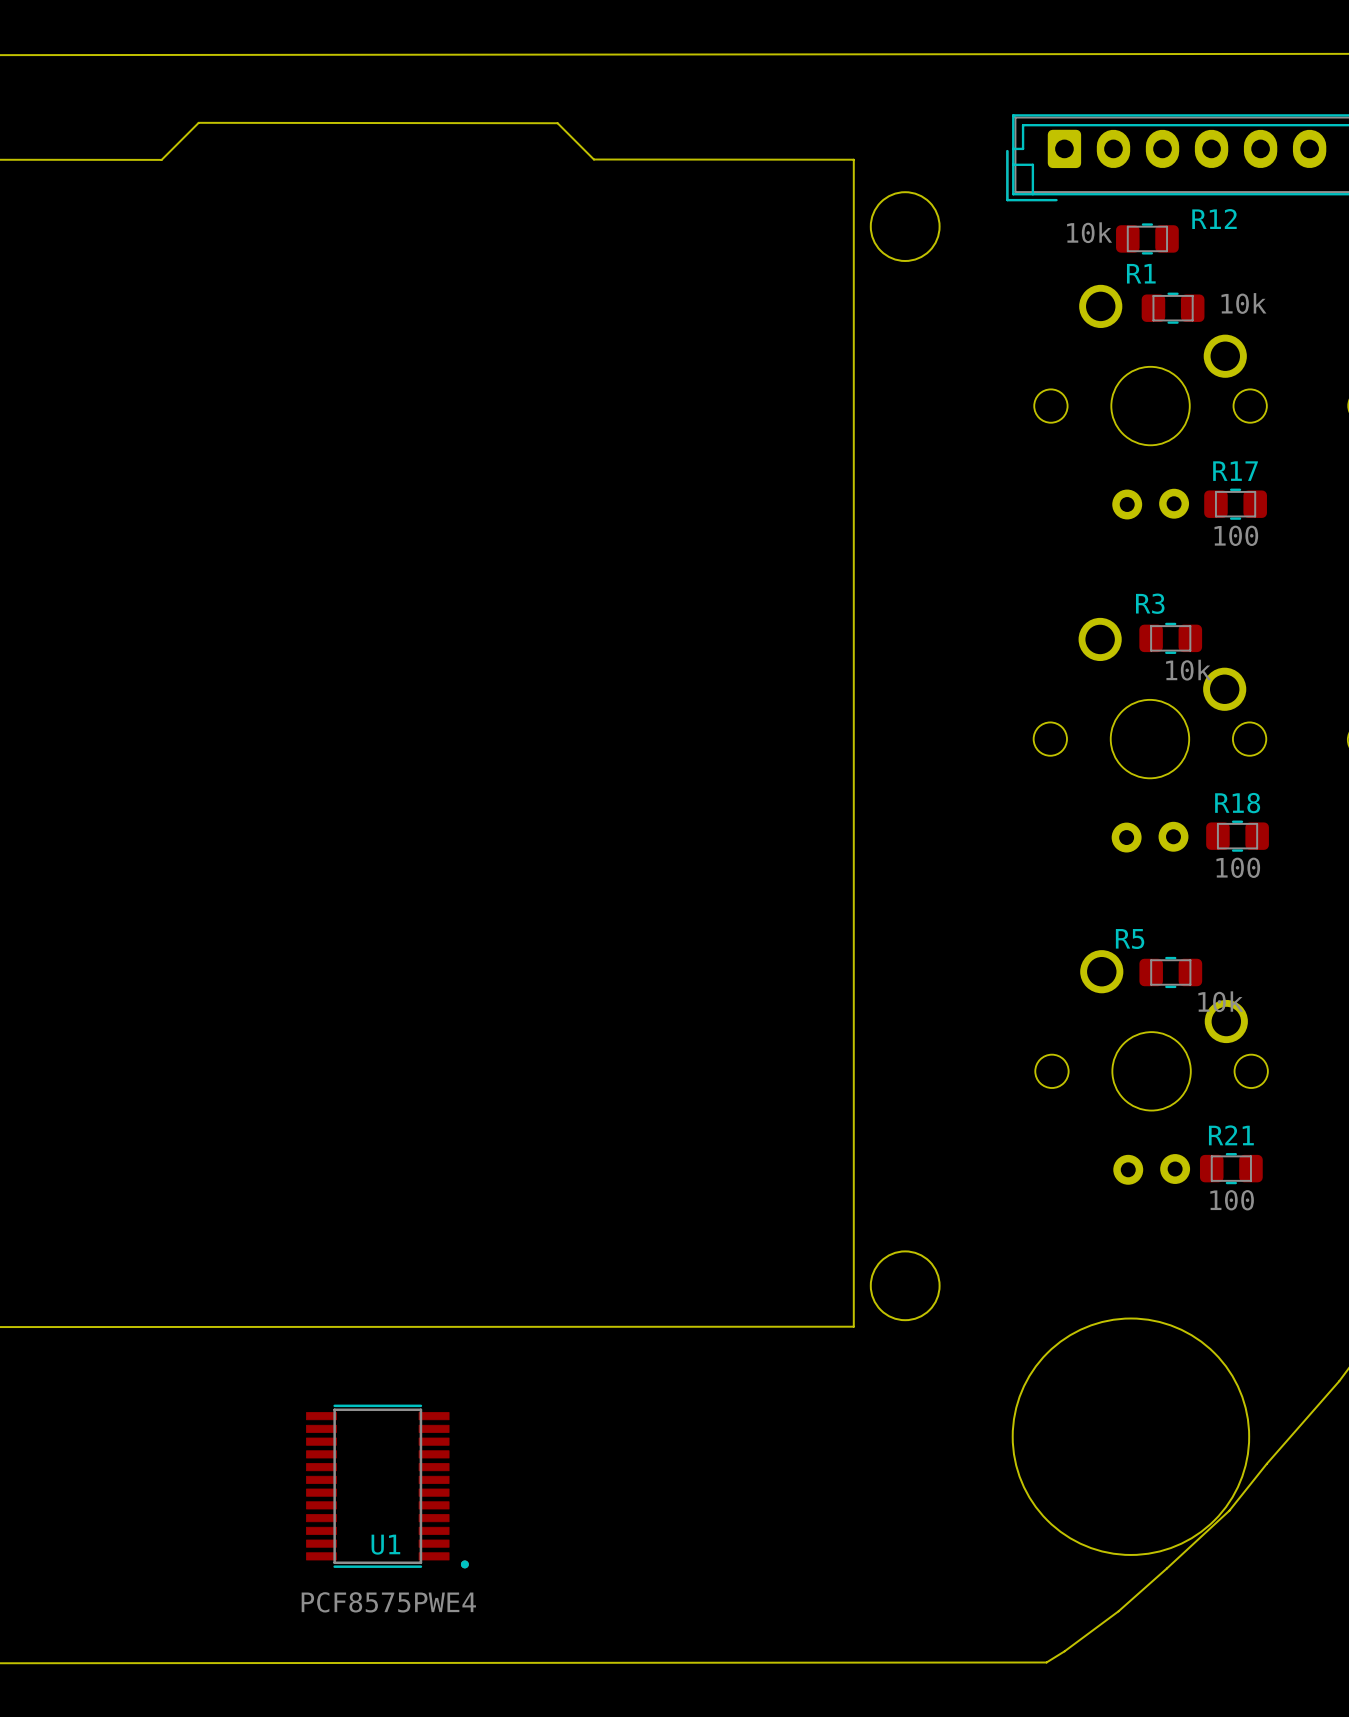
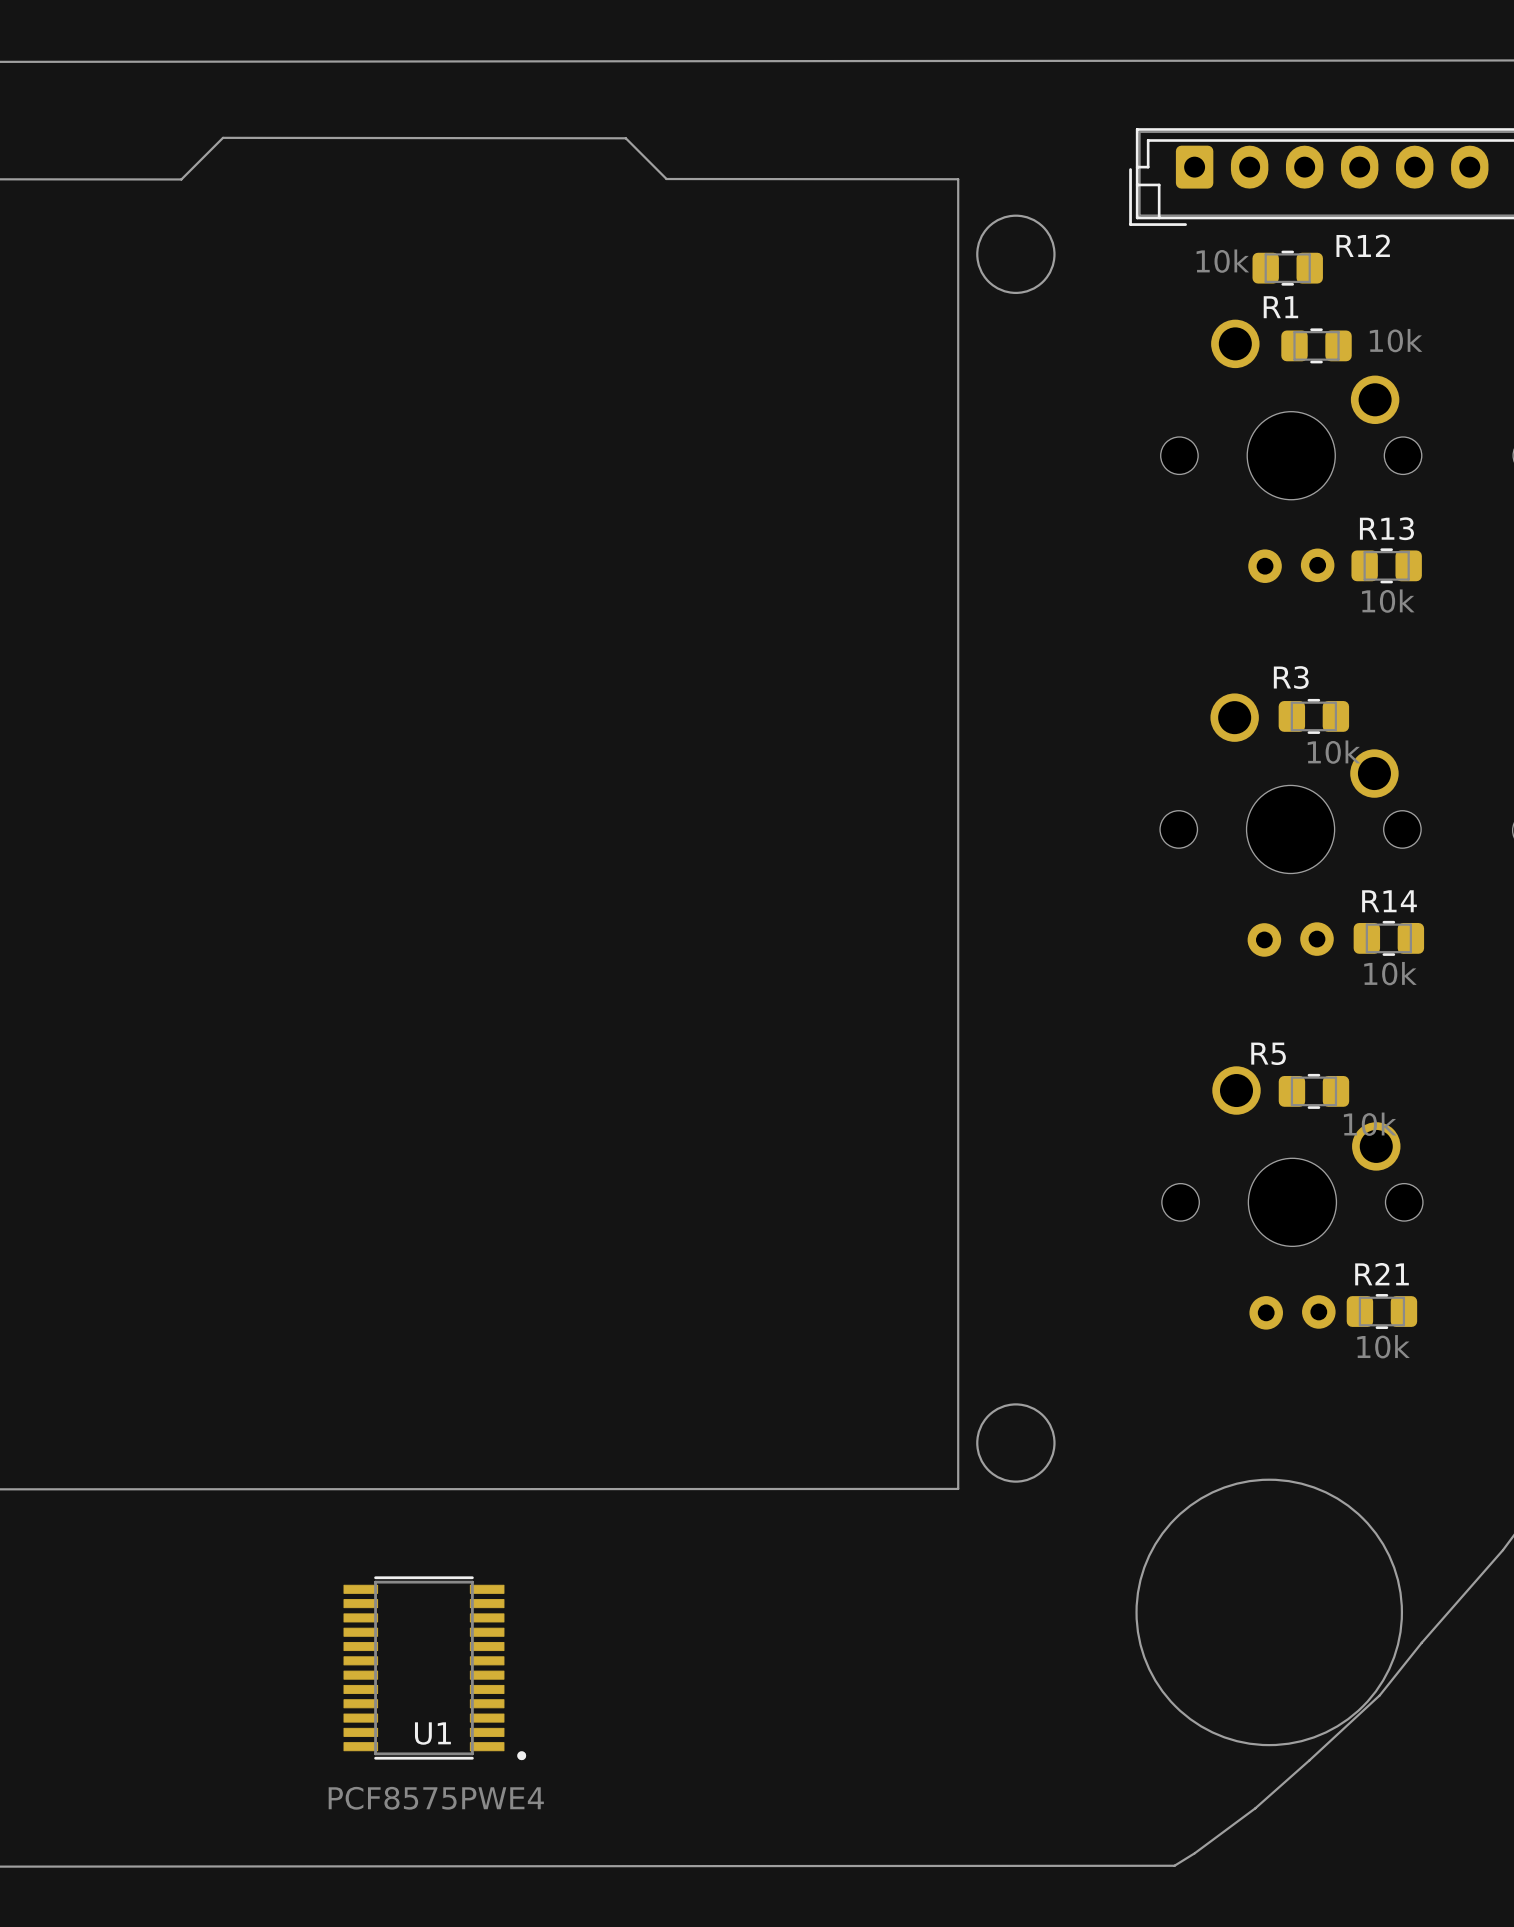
R17 name: R17 (1235, 471) -> R13 (1386, 528)
R17 value: 100 (1236, 535) -> 10k (1388, 601)
R18 name: R18 (1237, 803) -> R14 (1389, 901)
R18 value: 100 (1238, 867) -> 10k (1390, 973)
R21 value: 100 (1232, 1200) -> 10k (1383, 1346)

